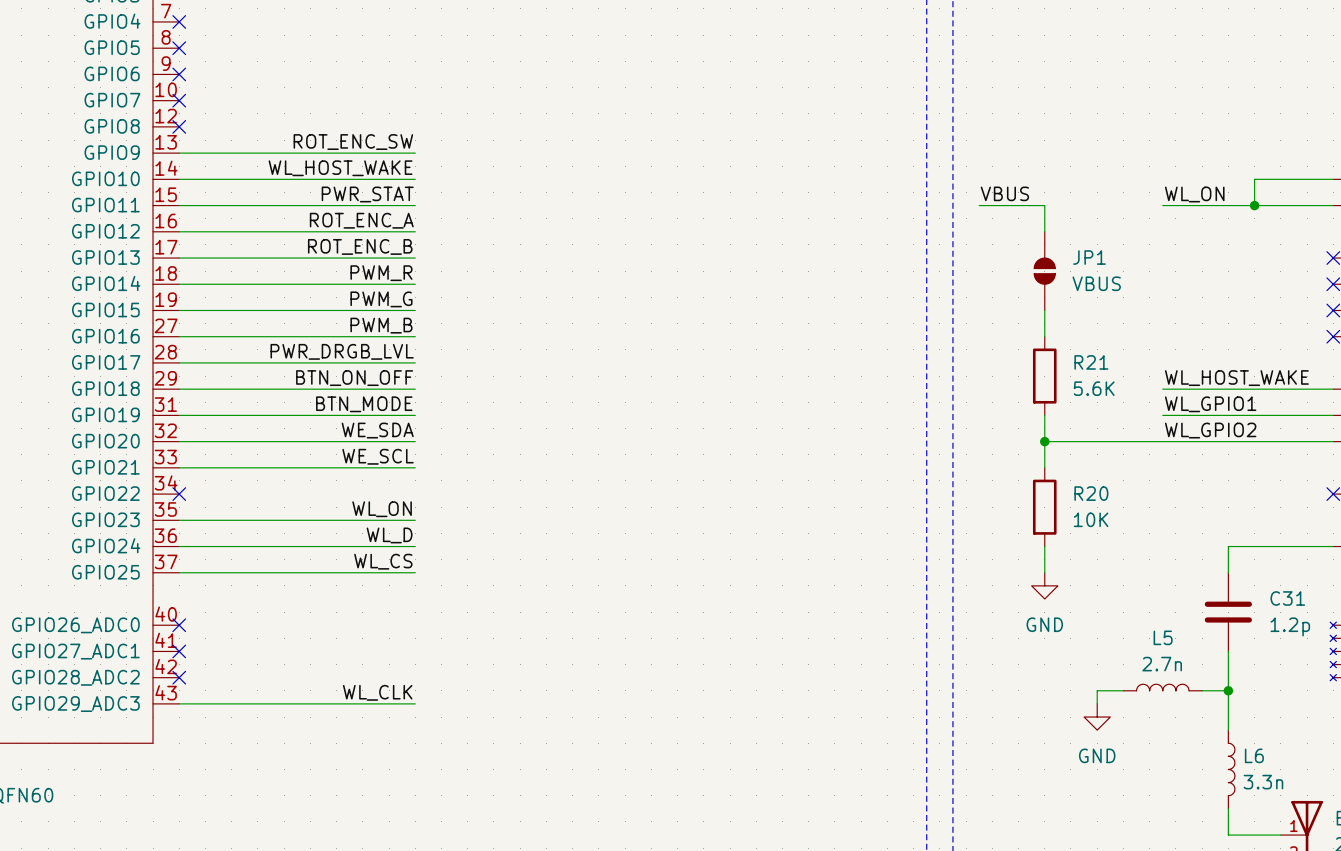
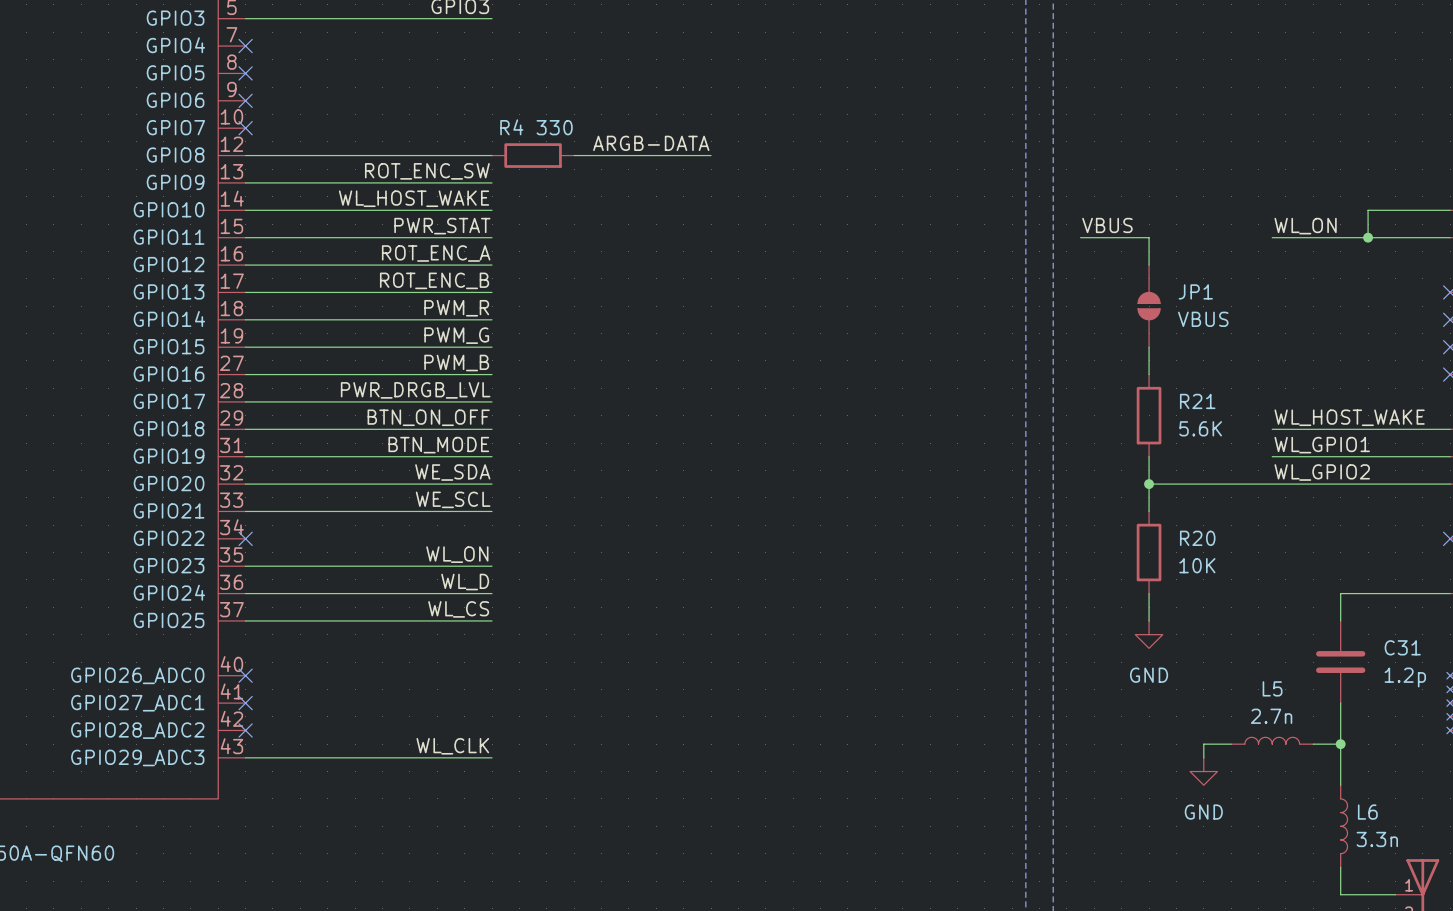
label: none -> ARGB-DATA (651, 143)
wire: none -> (245, 155) (492, 155)
no-connect mark: (179, 126) -> none
R4: none -> 330 (533, 155)
wire: none -> (574, 155) (711, 155)

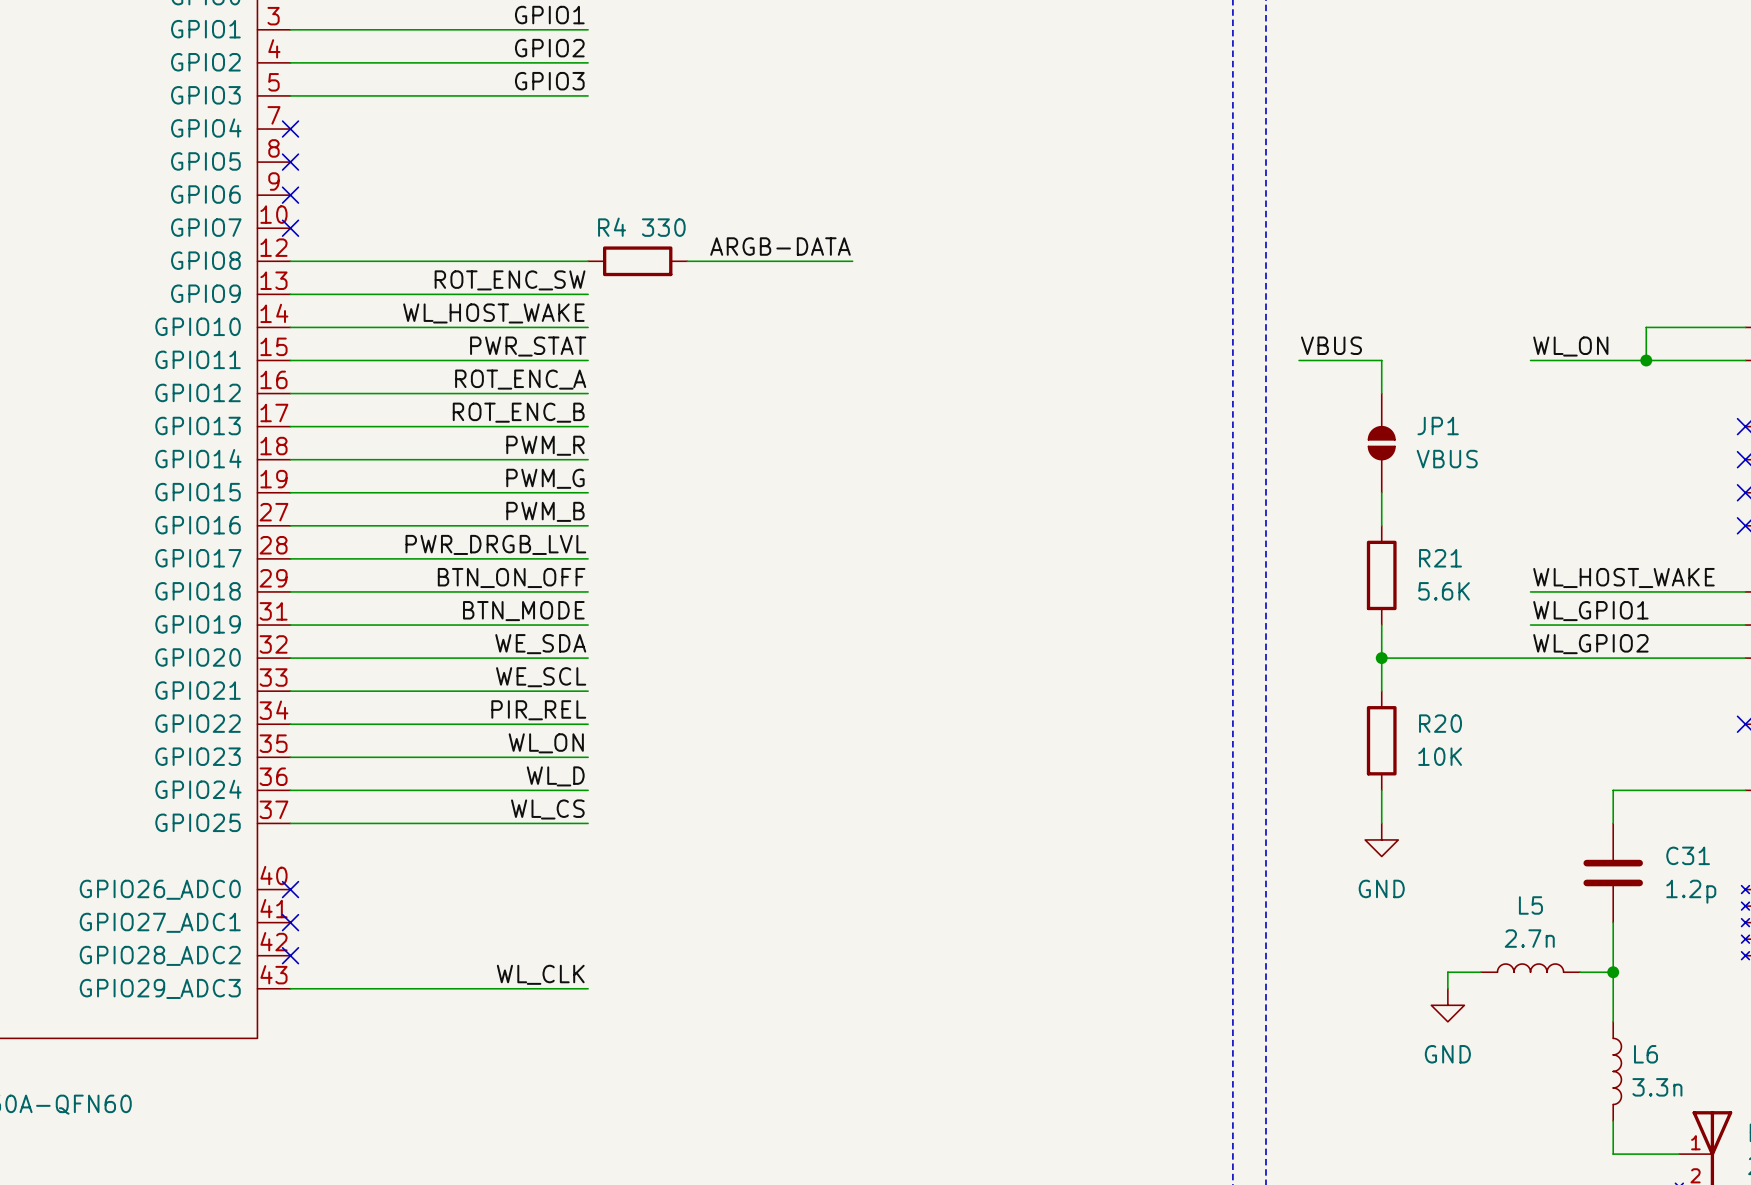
label: none -> PIR_REL (538, 710)
wire: none -> (290, 724) (588, 724)
no-connect mark: (245, 538) -> none

